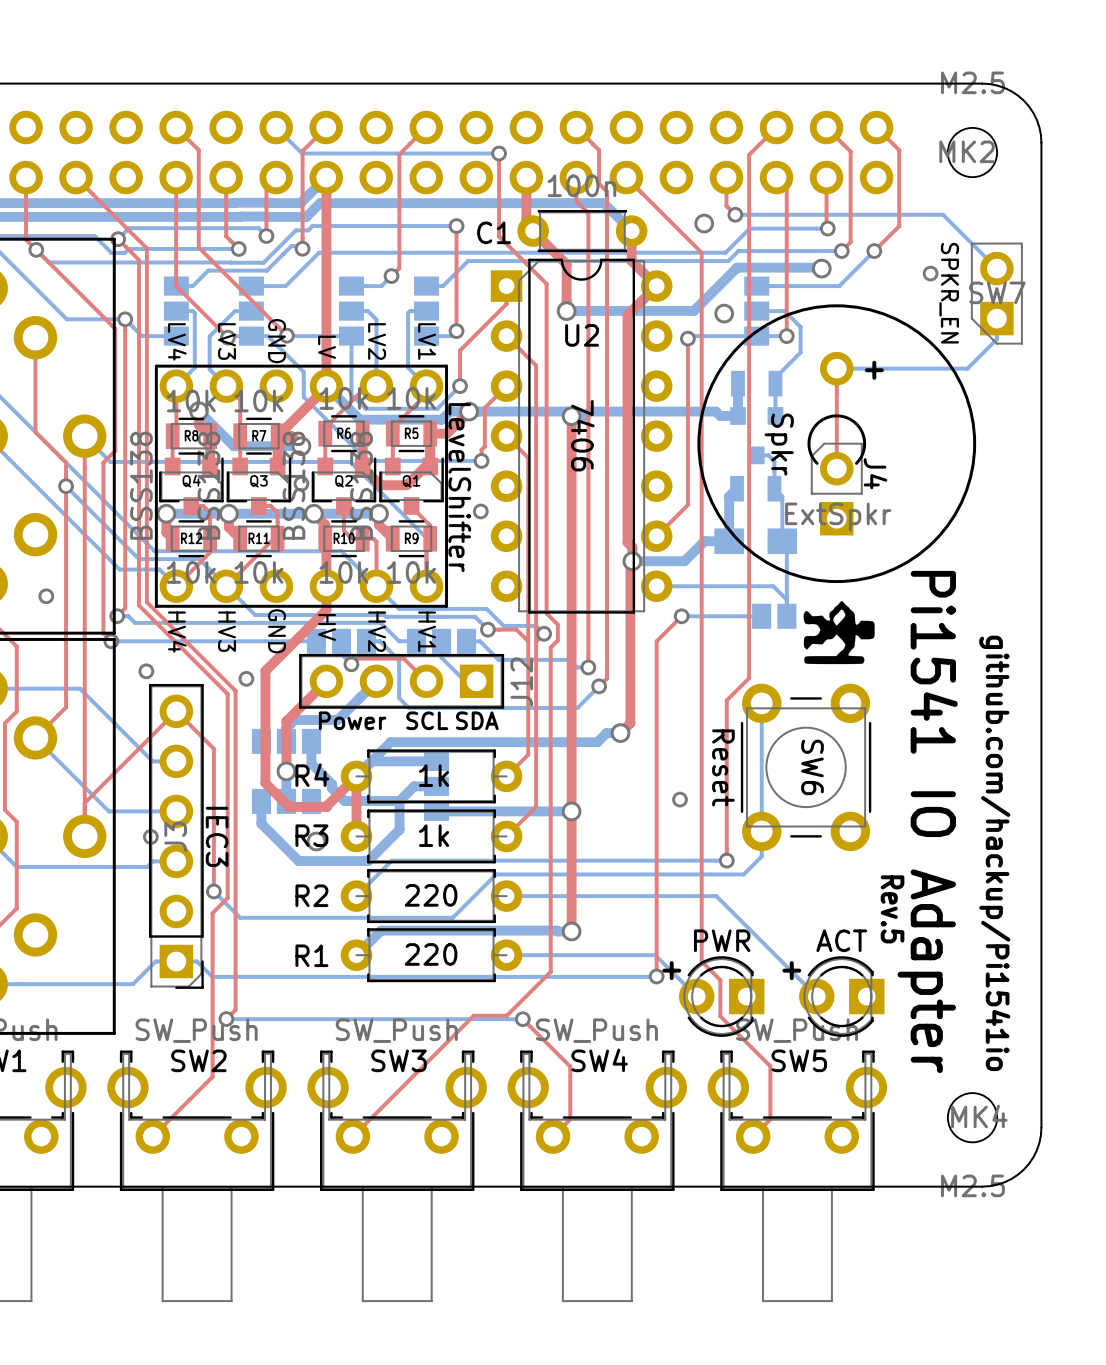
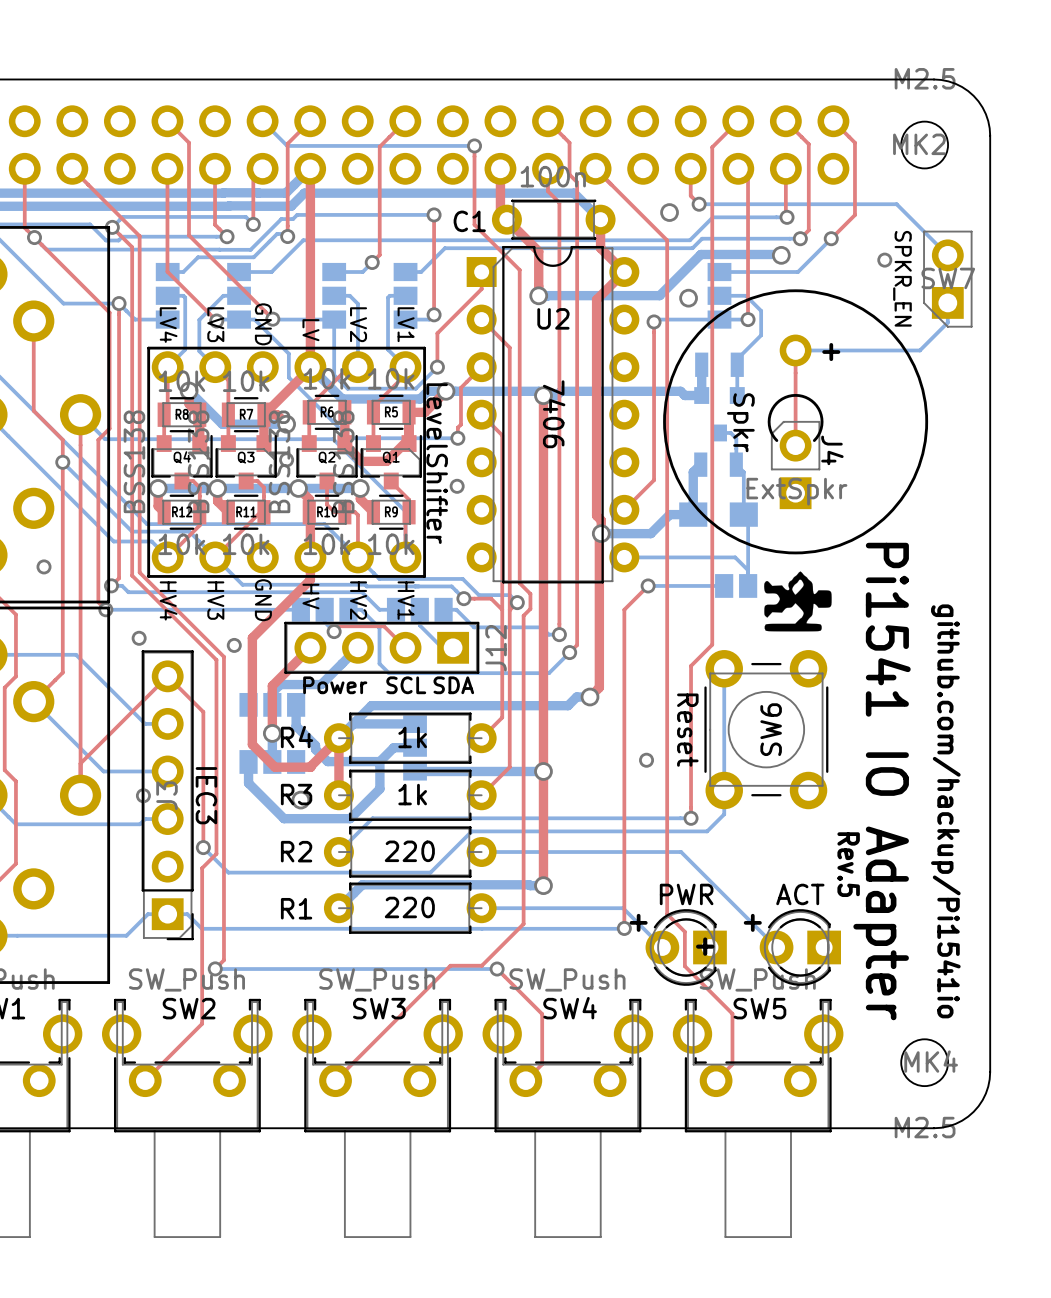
SW6 name rotation: 0° (812, 767) -> 180° (771, 729)
text: none -> + (705, 946)

